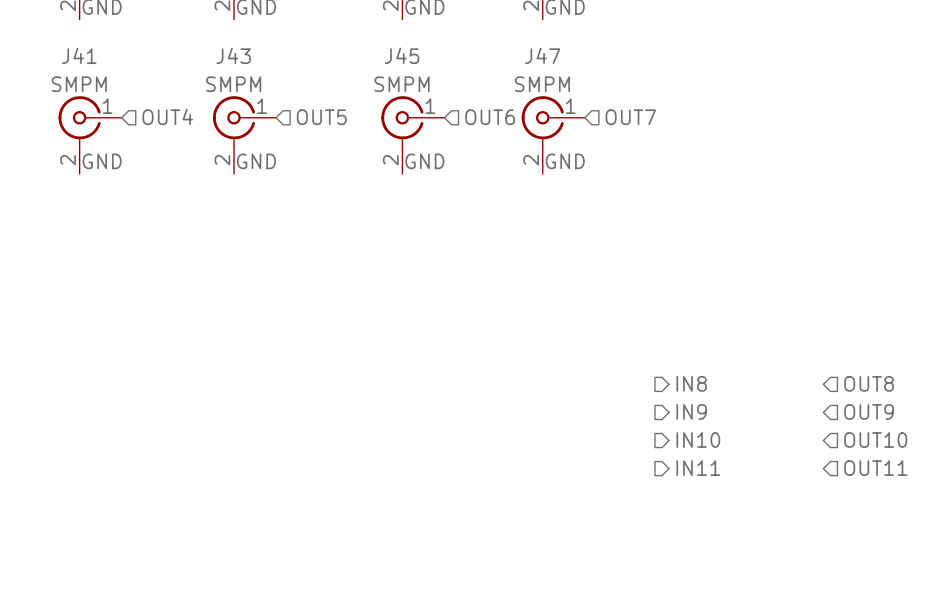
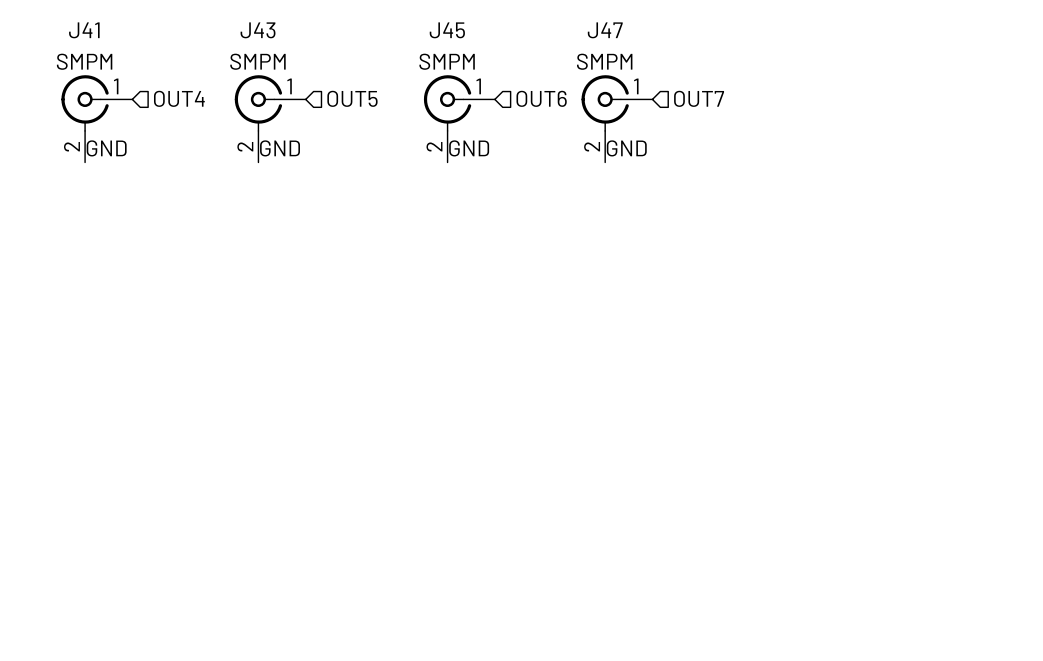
hierarchical label: IN8 (691, 383) -> none
hierarchical label: OUT8 (869, 383) -> none
hierarchical label: IN9 (691, 411) -> none
hierarchical label: OUT9 (869, 411) -> none
hierarchical label: IN10 (698, 440) -> none
hierarchical label: OUT10 (875, 440) -> none
hierarchical label: IN11 (698, 468) -> none
hierarchical label: OUT11 (875, 468) -> none

